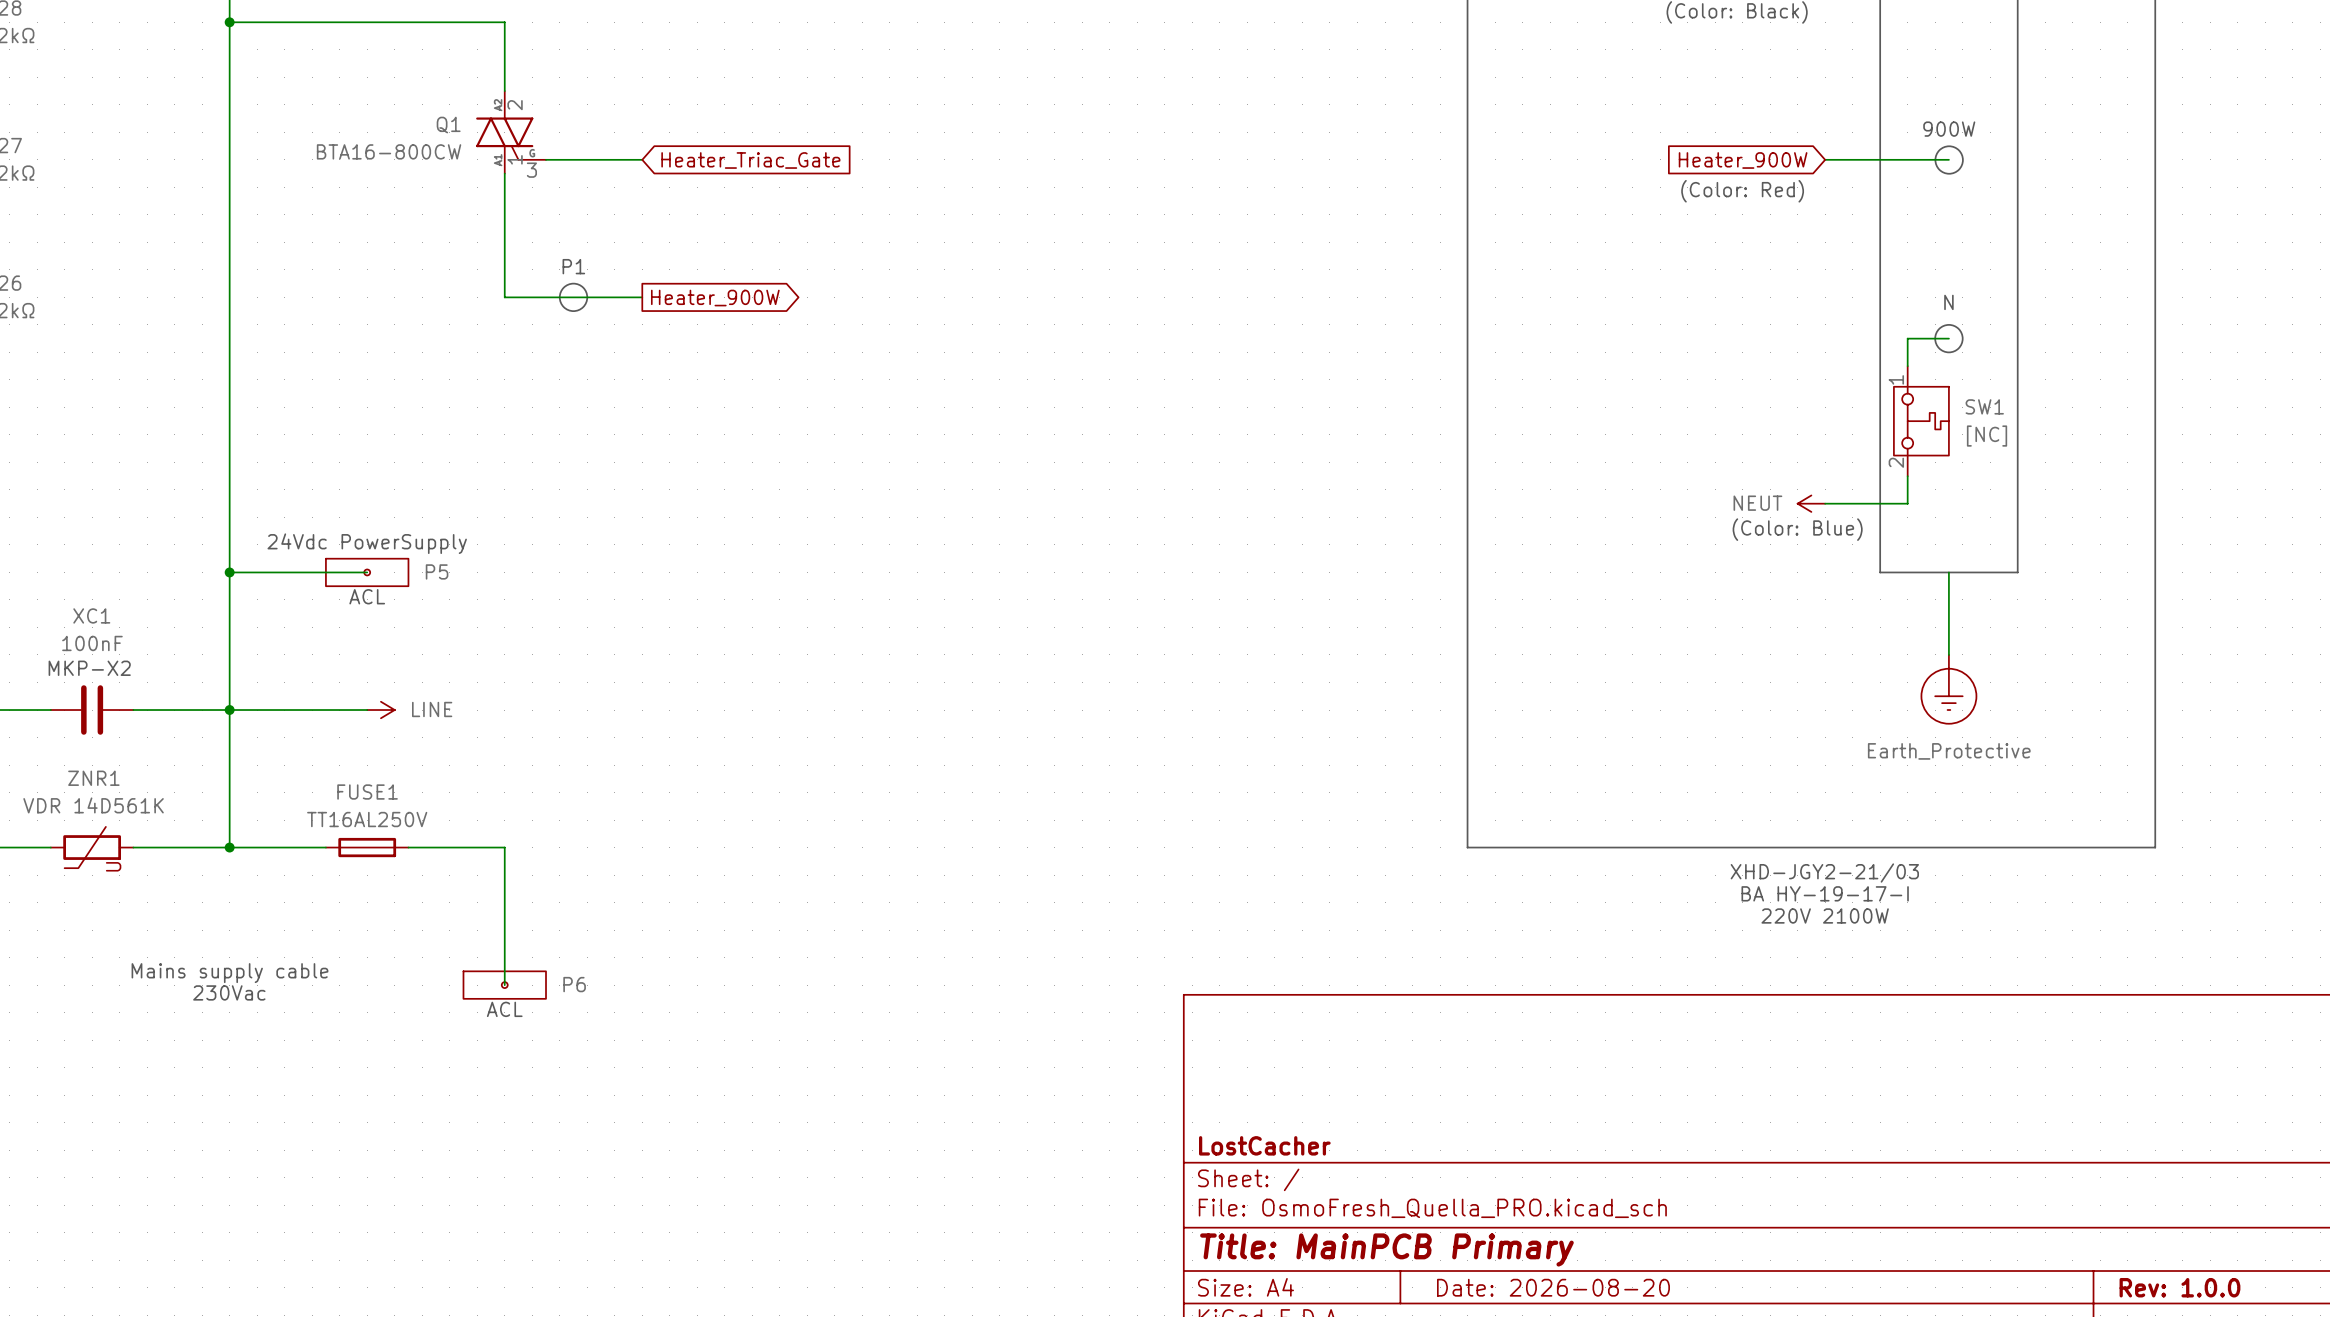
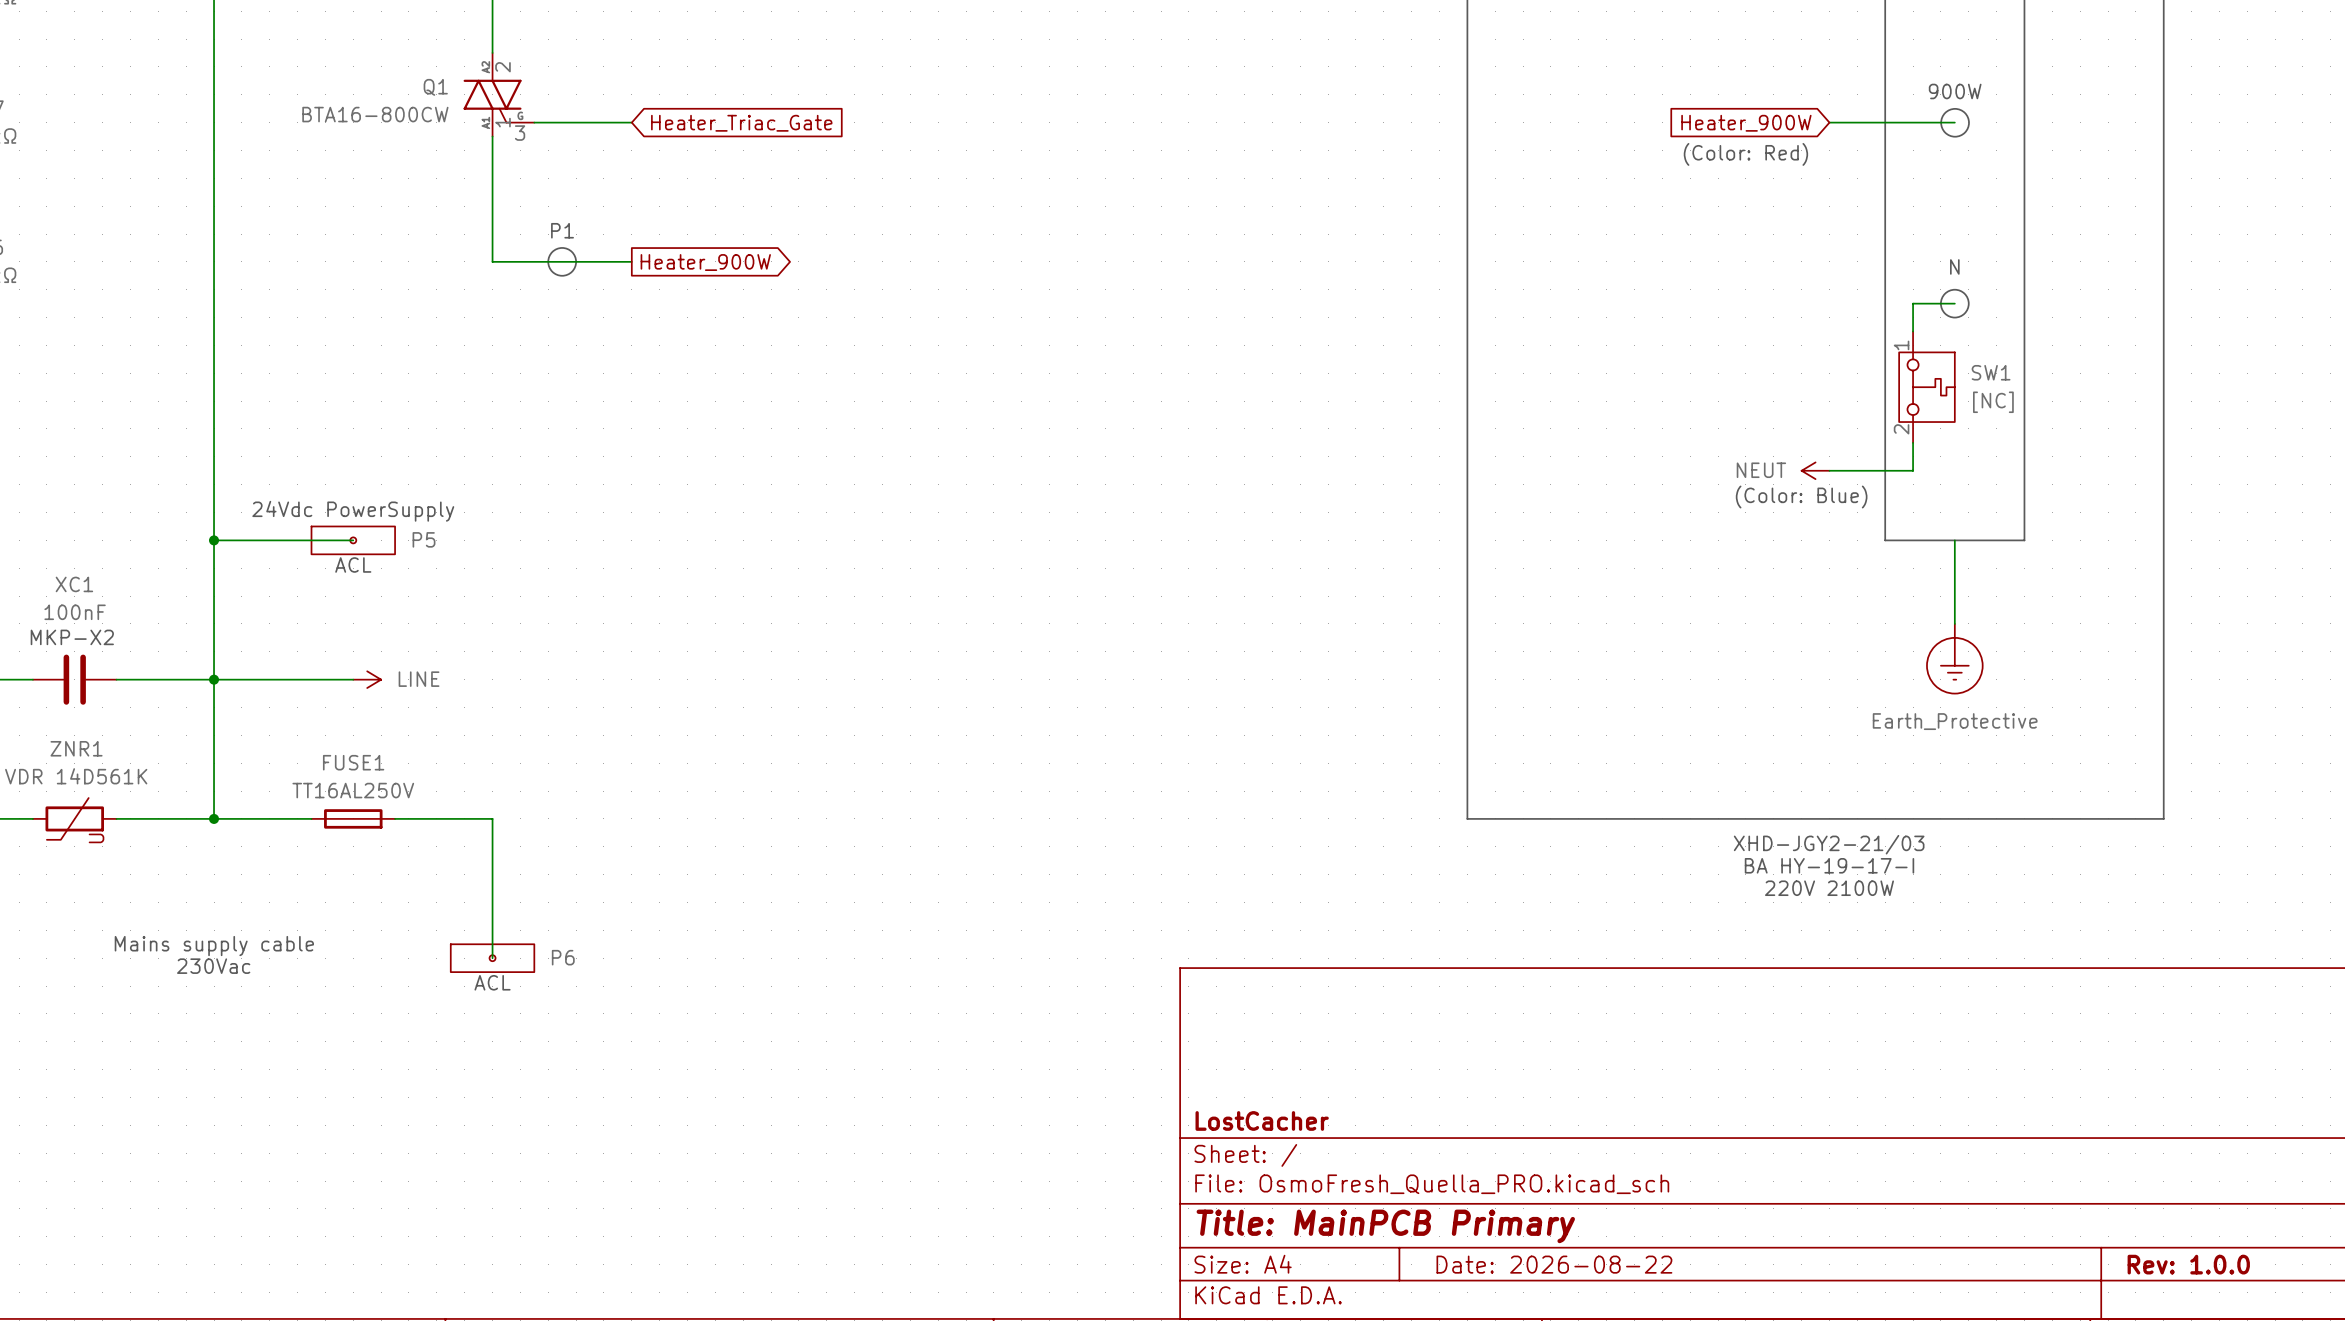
title block: Date: 2026-08-20 (1553, 1287) -> Date: 2026-08-22 (1554, 1264)

